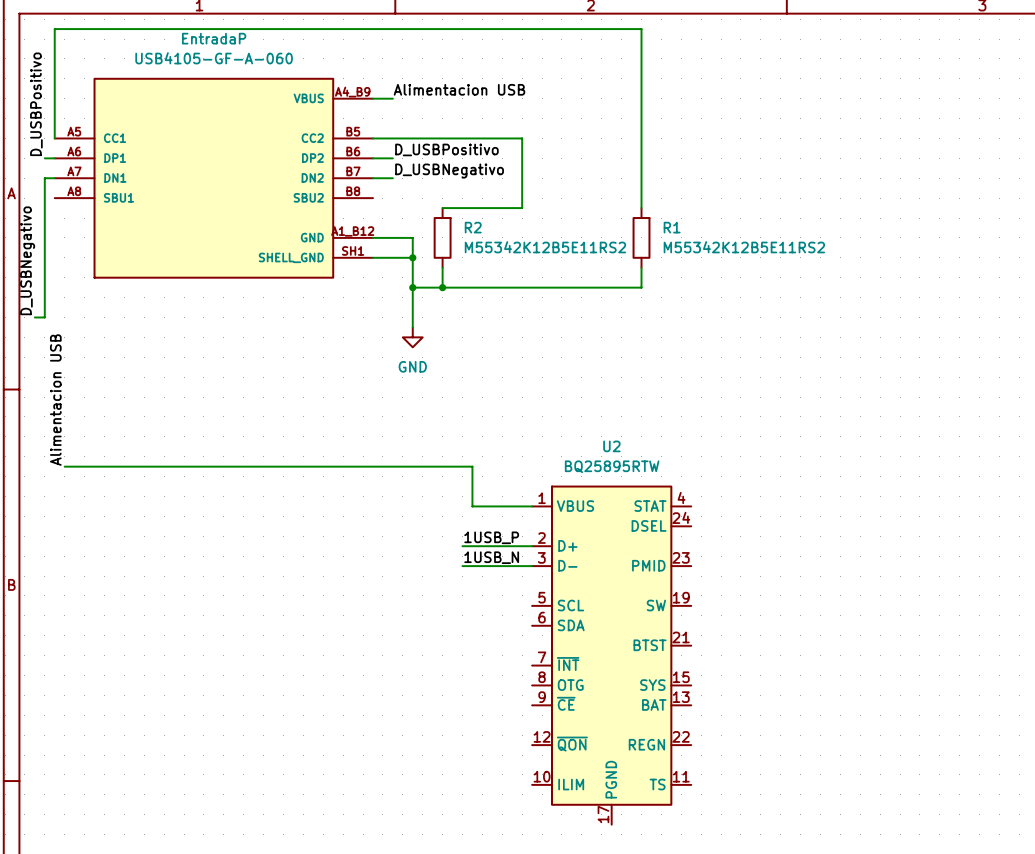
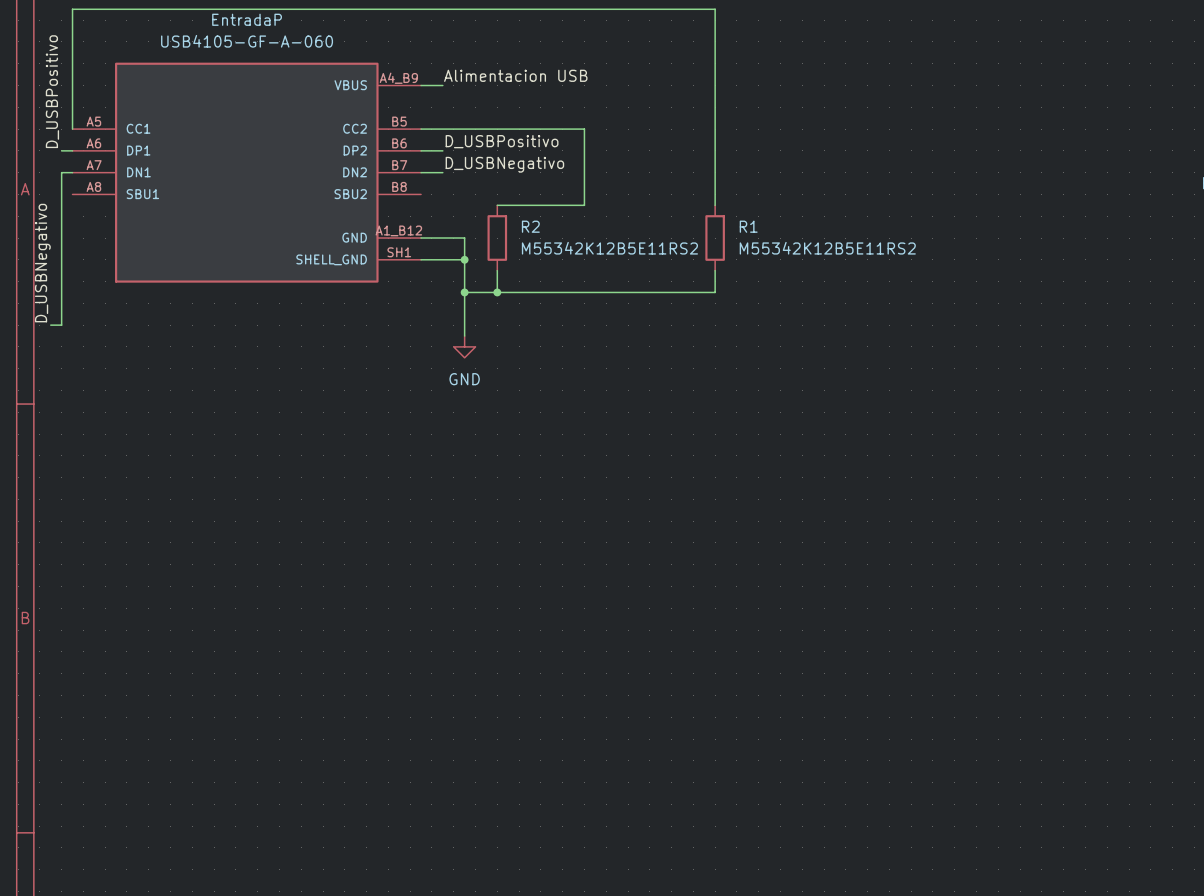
label: Alimentacion USB (55, 400) -> none
wire: (64, 466) (472, 466) (472, 506) (532, 506) -> none
label: 1USB_P (491, 537) -> none
wire: (462, 546) (532, 546) -> none
label: 1USB_N (491, 557) -> none
wire: (462, 566) (532, 566) -> none
U2: BQ25895RTW (611, 655) -> none

